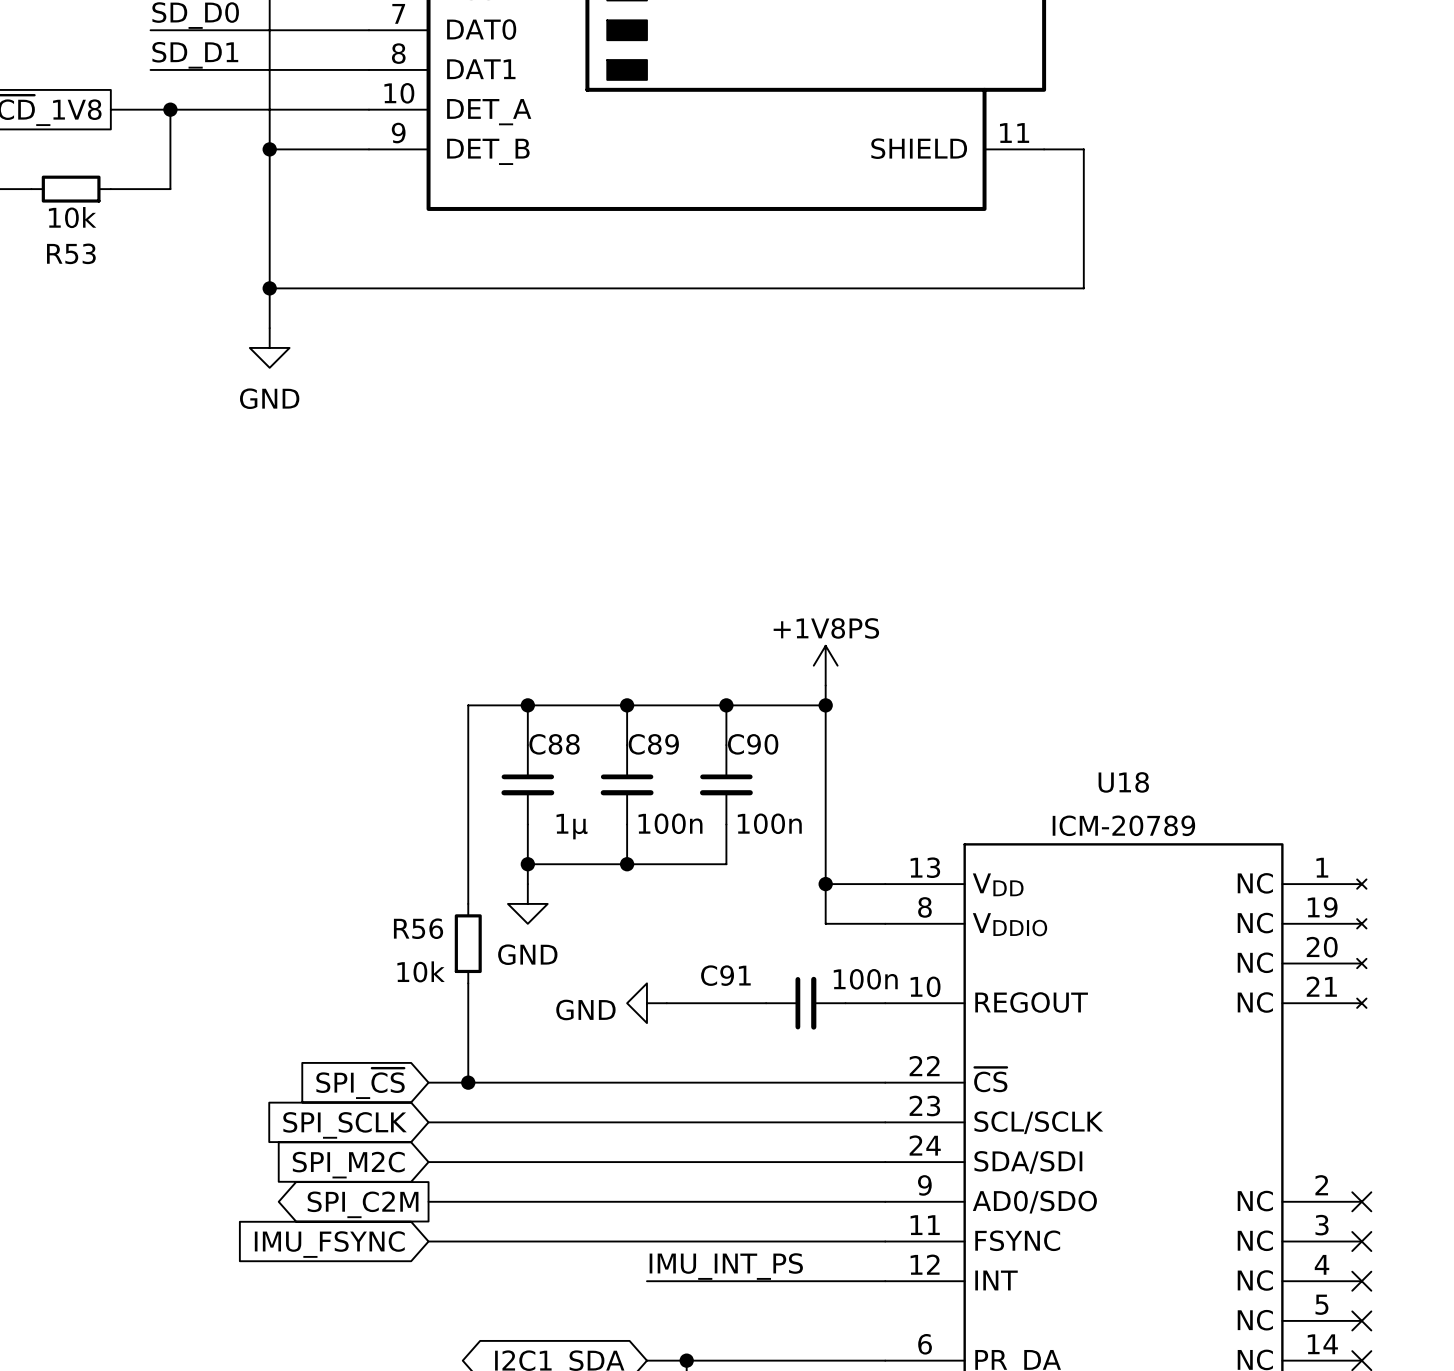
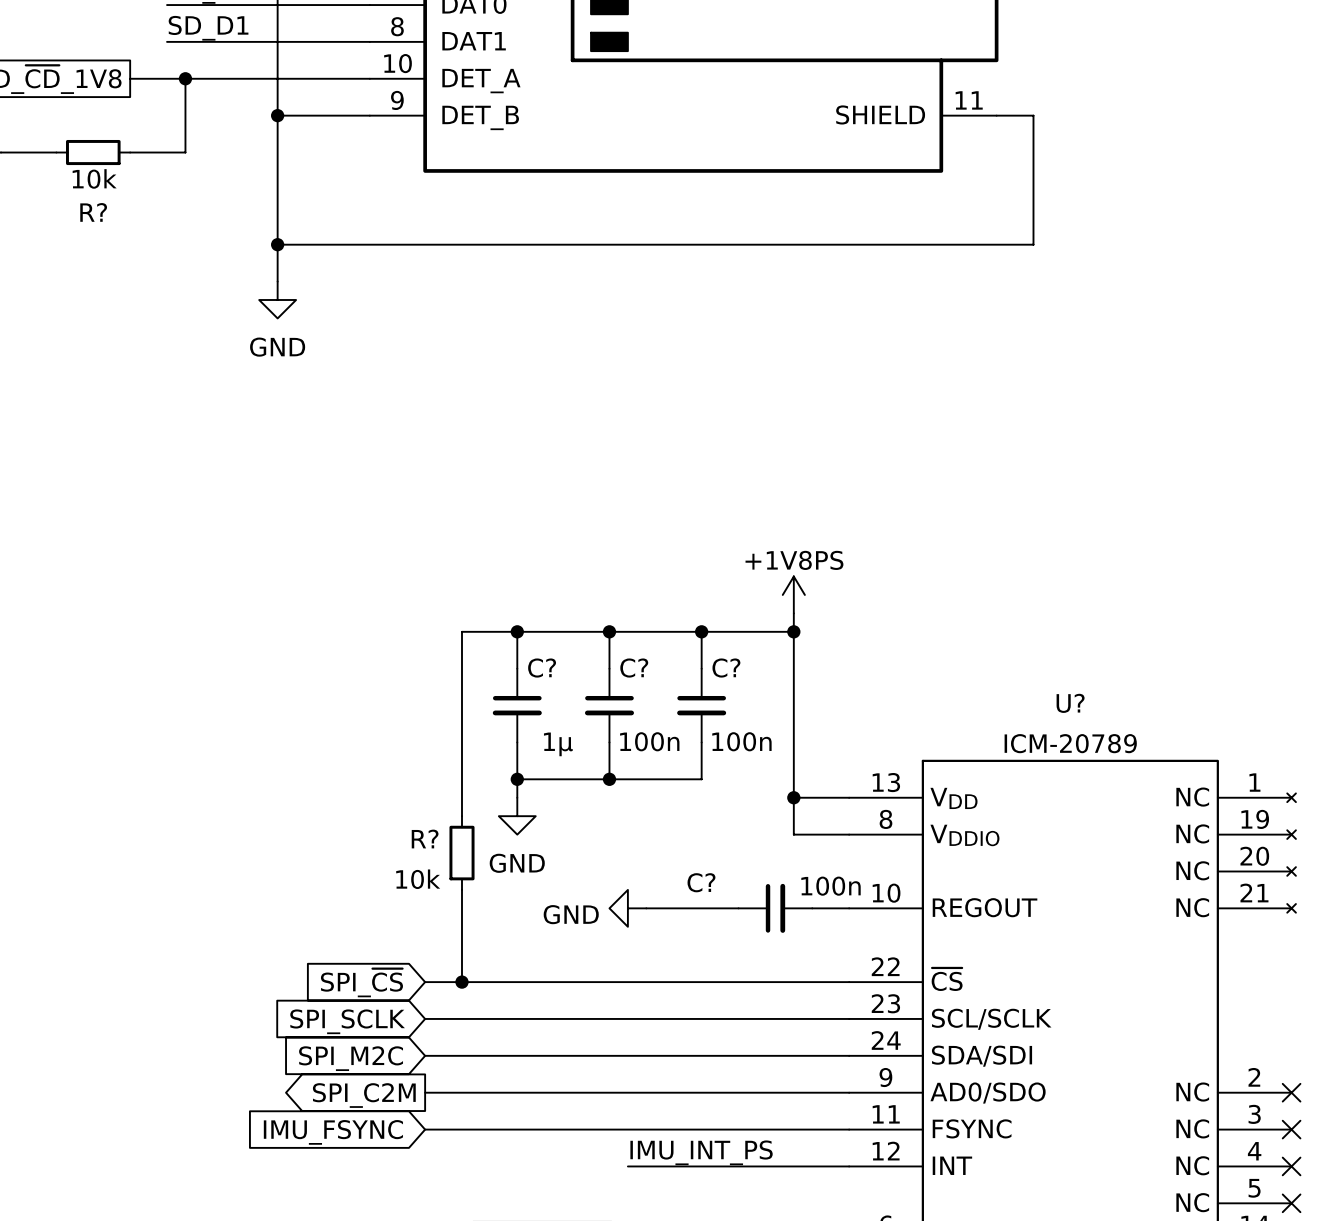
R53 name: R53 (71, 253) -> R? (93, 212)
C88 name: C88 (554, 744) -> C? (542, 668)
C89 name: C89 (653, 744) -> C? (634, 668)
C90 name: C90 (753, 744) -> C? (726, 668)
U18 name: U18 (1123, 782) -> U? (1070, 703)
R56 name: R56 (418, 928) -> R? (425, 839)
C91 name: C91 (725, 975) -> C? (701, 882)

